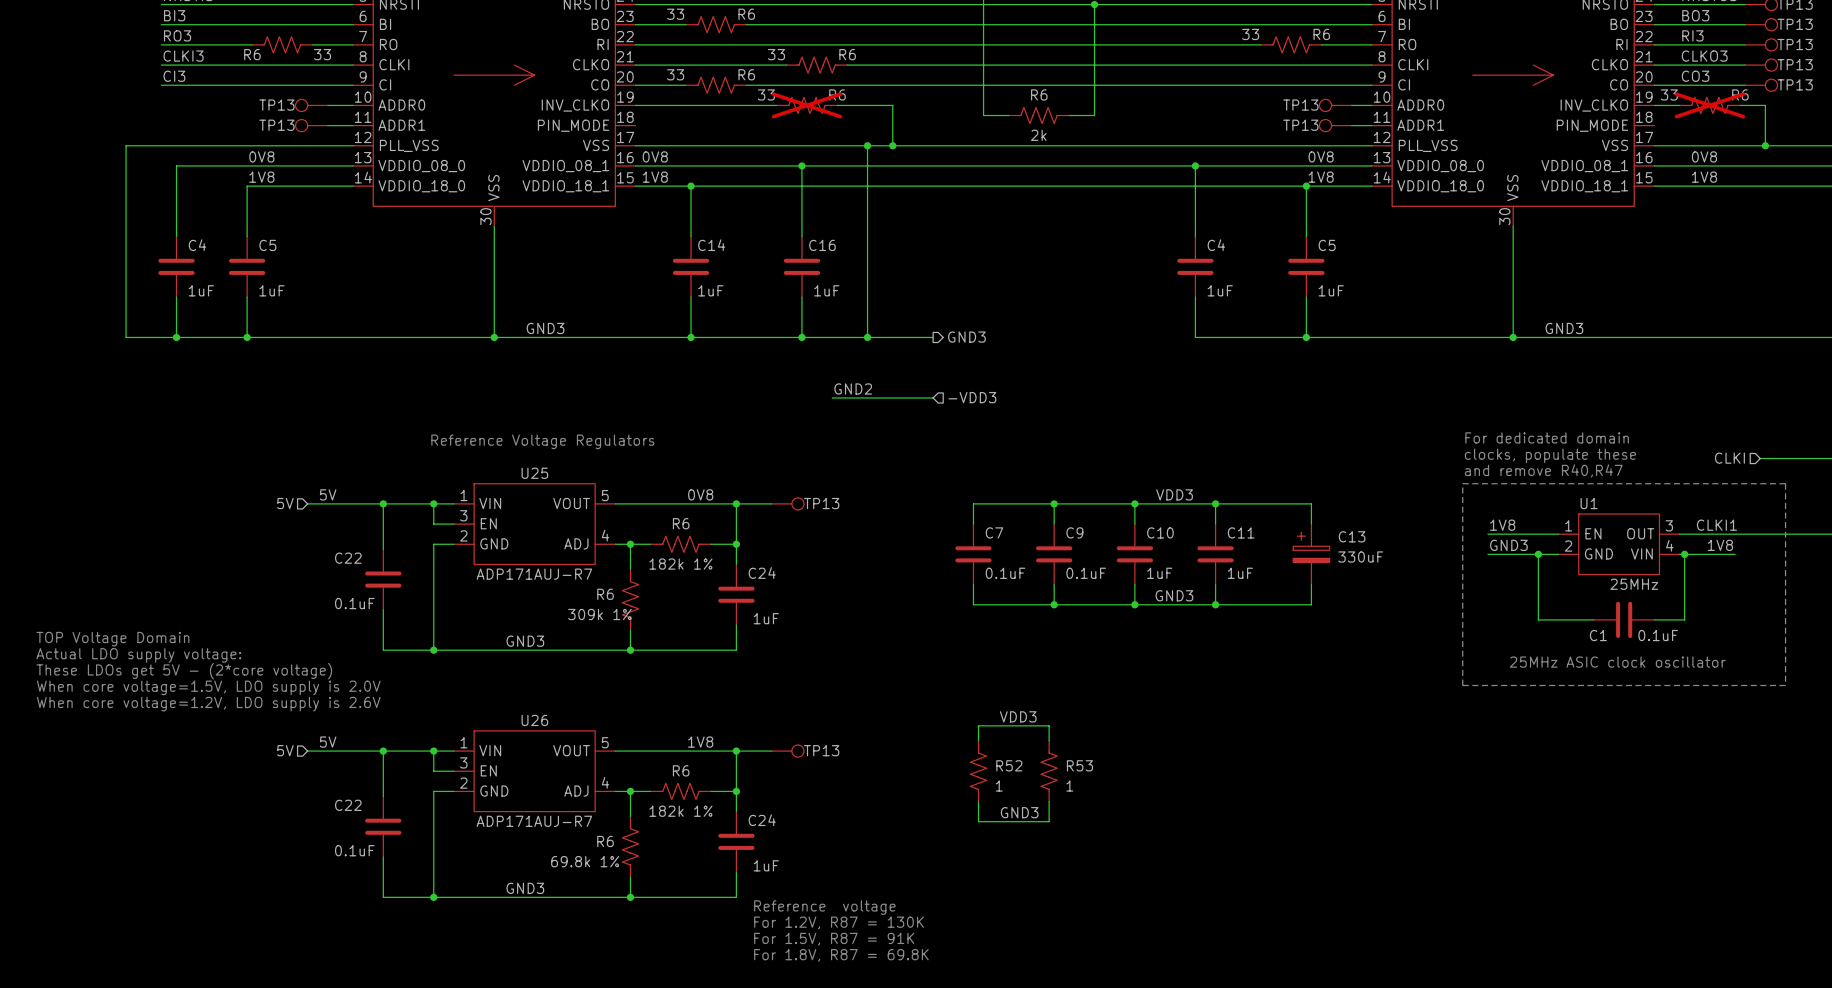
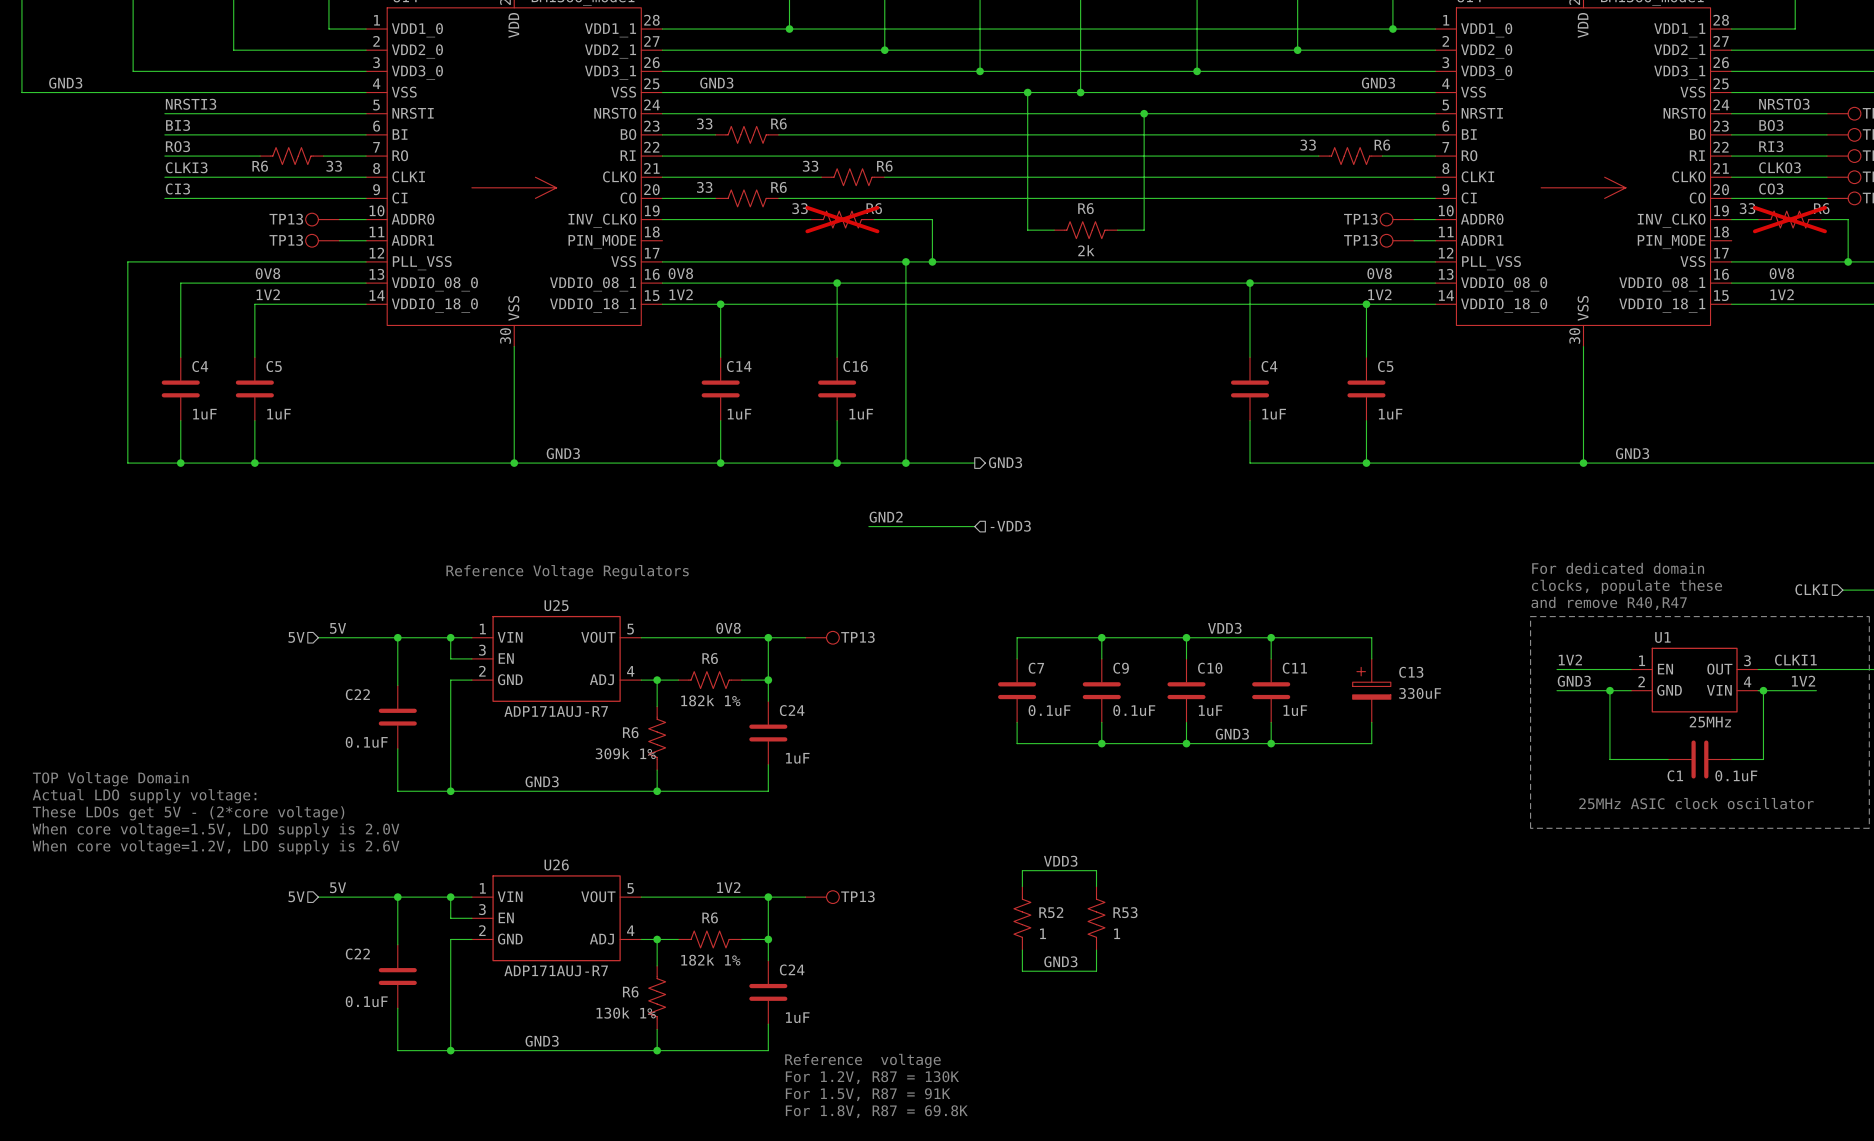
label: 1V8 (261, 177) -> 1V2 (268, 294)
label: 1V8 (655, 177) -> 1V2 (681, 294)
label: 1V8 (1321, 177) -> 1V2 (1379, 294)
label: 1V8 (1704, 177) -> 1V2 (1782, 294)
label: 1V8 (1502, 525) -> 1V2 (1570, 659)
label: 1V8 (1720, 545) -> 1V2 (1803, 681)
label: 1V8 (700, 742) -> 1V2 (728, 887)
R6 value: 69.8k 1% (585, 861) -> 130k 1% (626, 1013)

